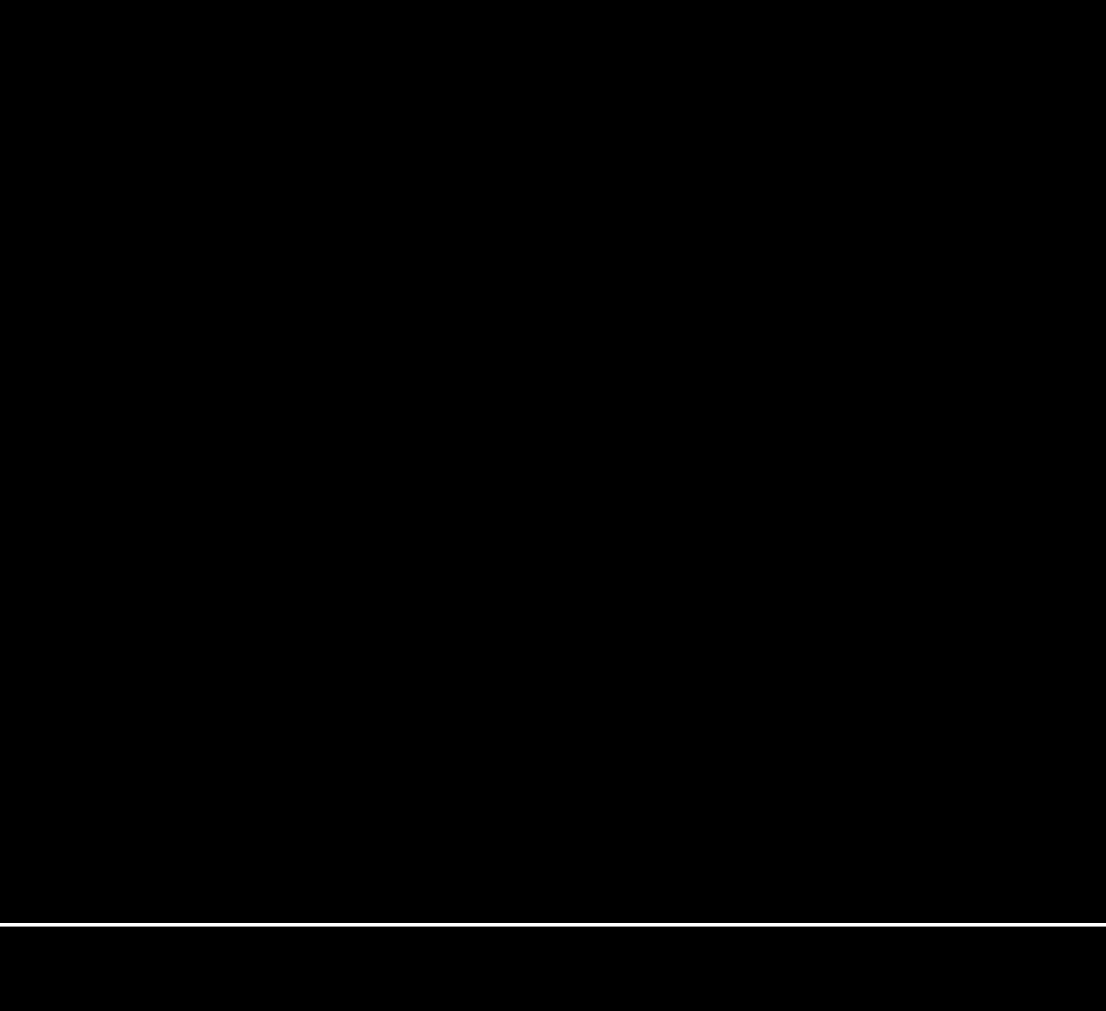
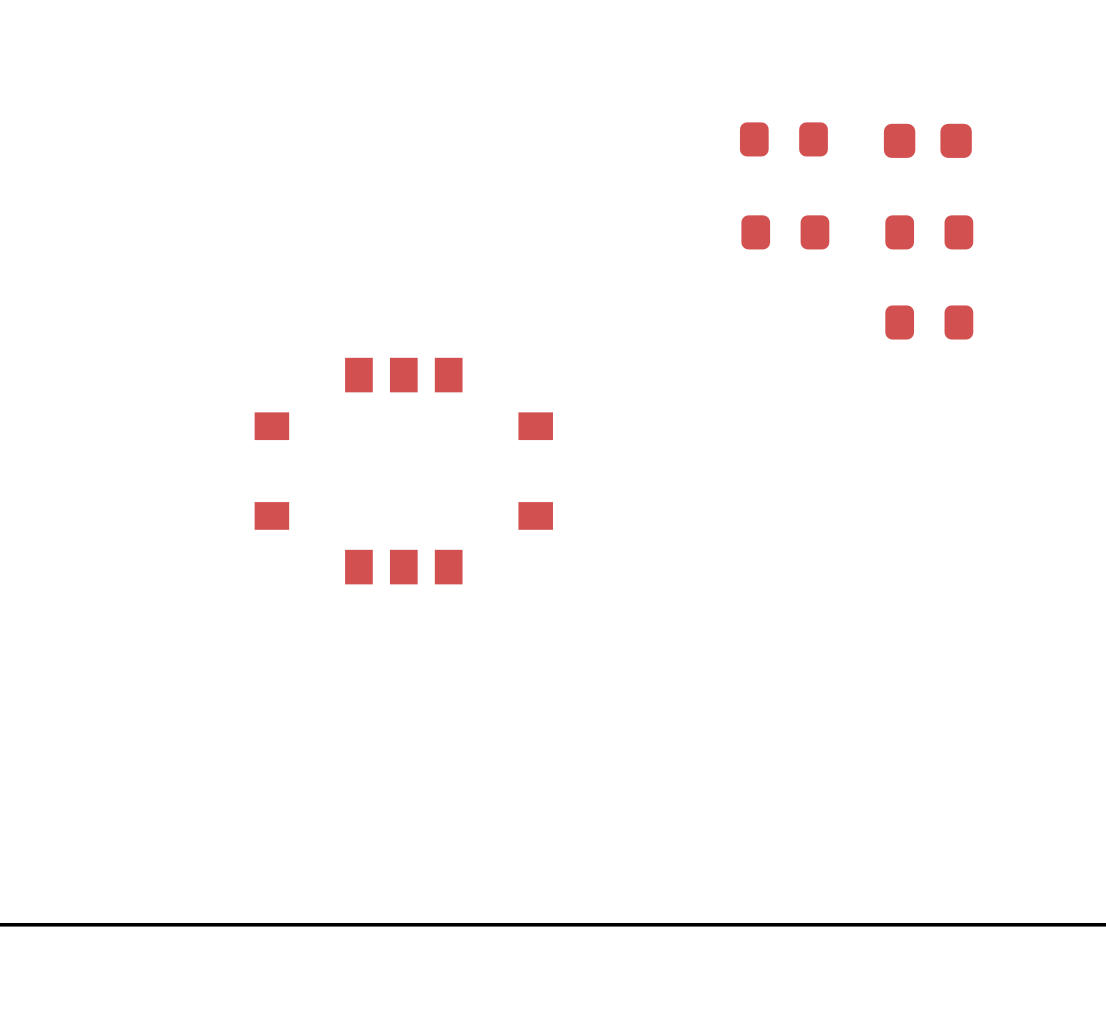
part: none -> (783, 139)
part: none -> (927, 140)
part: none -> (785, 232)
part: none -> (929, 232)
part: none -> (929, 322)
part: none -> (403, 471)

